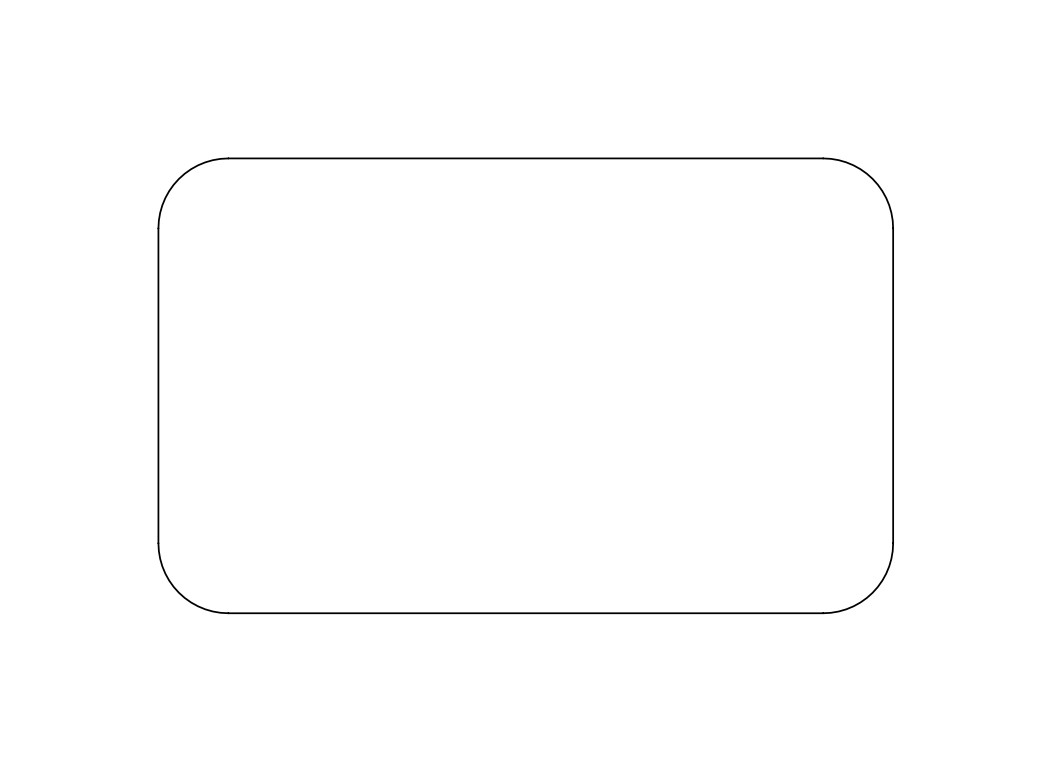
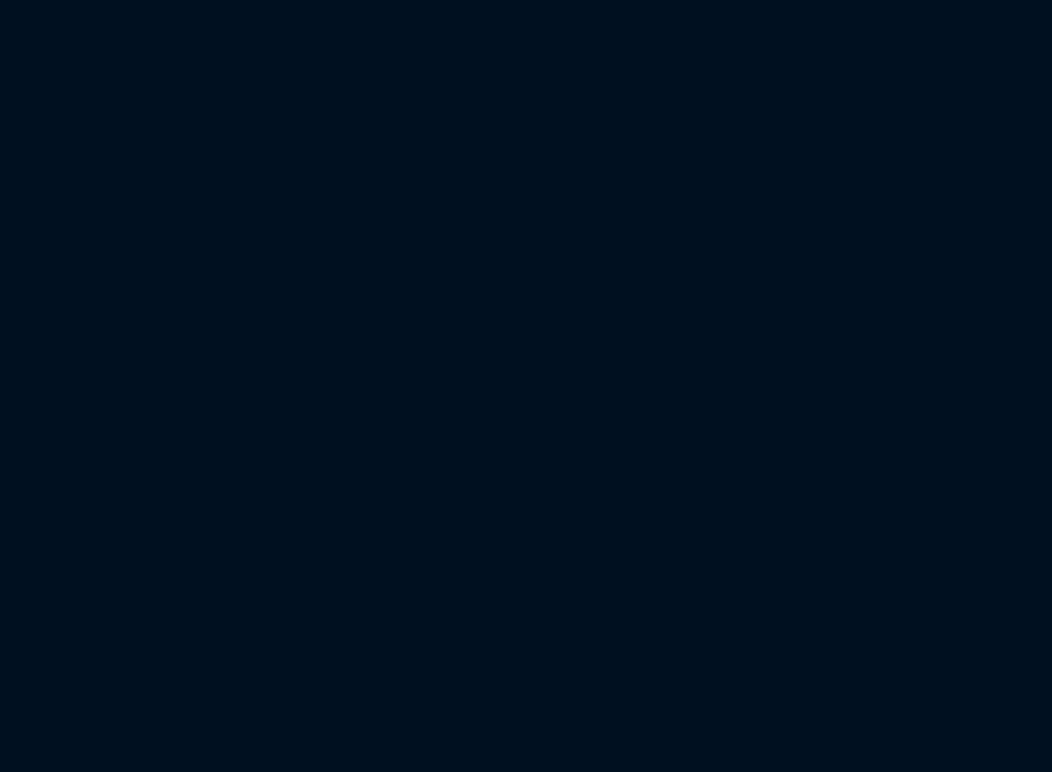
board edge: (823, 158) (228, 158) (212, 160) (191, 169) (178, 178) (169, 191) (162, 205) (158, 228) (158, 543) (162, 566) (169, 580) (178, 592) (198, 606) (212, 611) (228, 613) (823, 613) (846, 609) (860, 602) (872, 592) (882, 580) (889, 566) (892, 551) (892, 220) (886, 198) (872, 178) (853, 165) (838, 160) (823, 158) -> none

